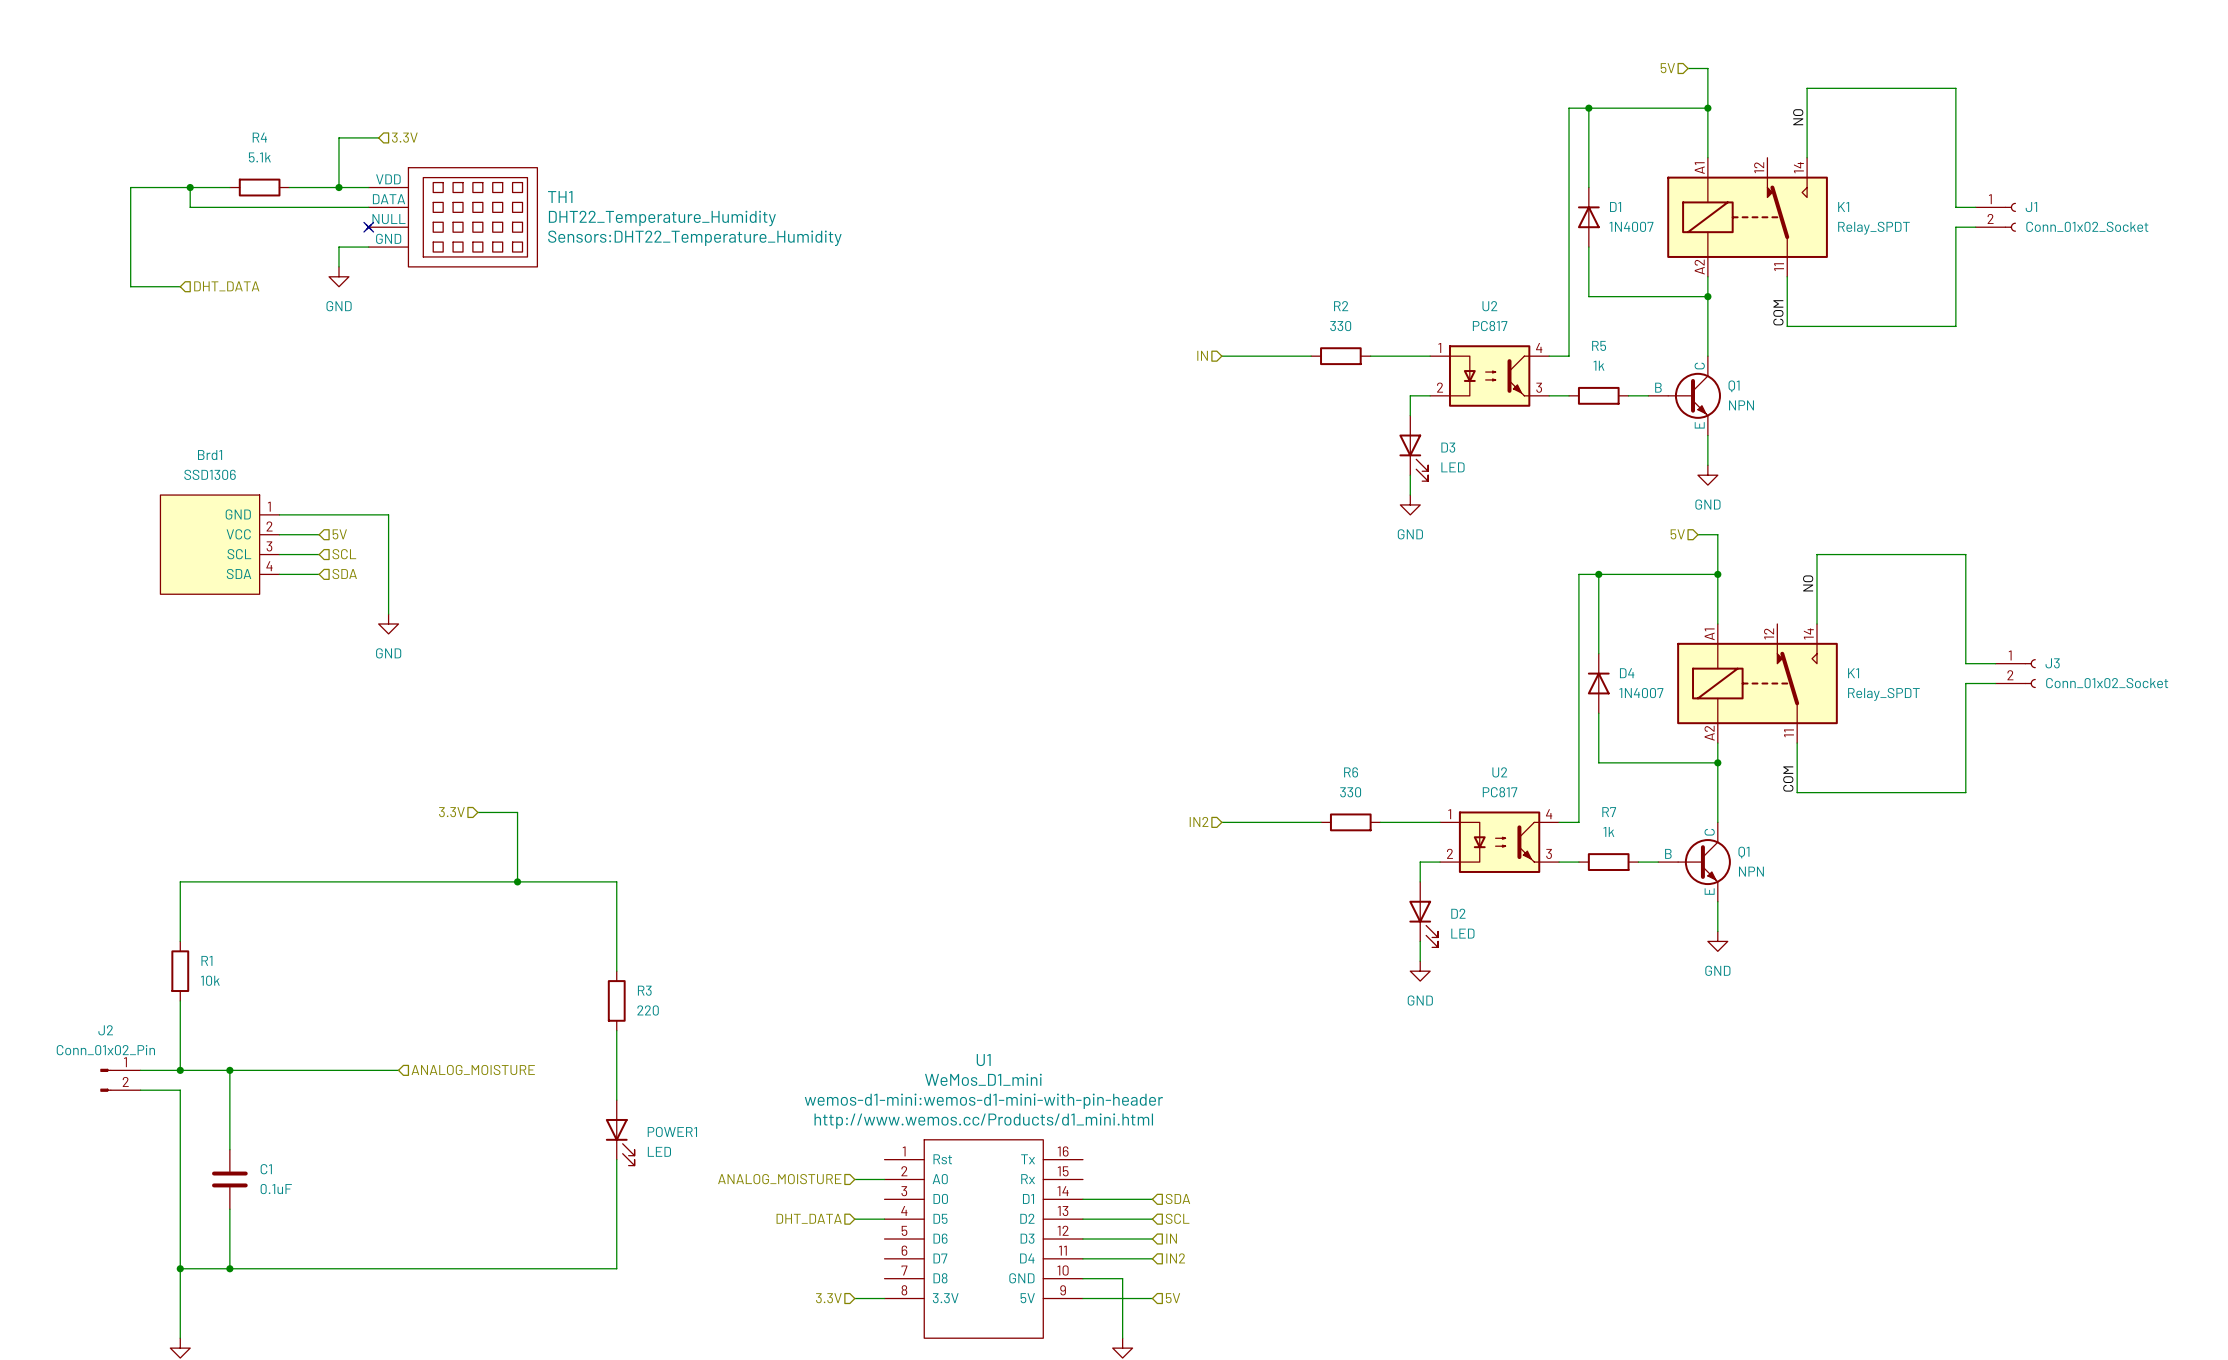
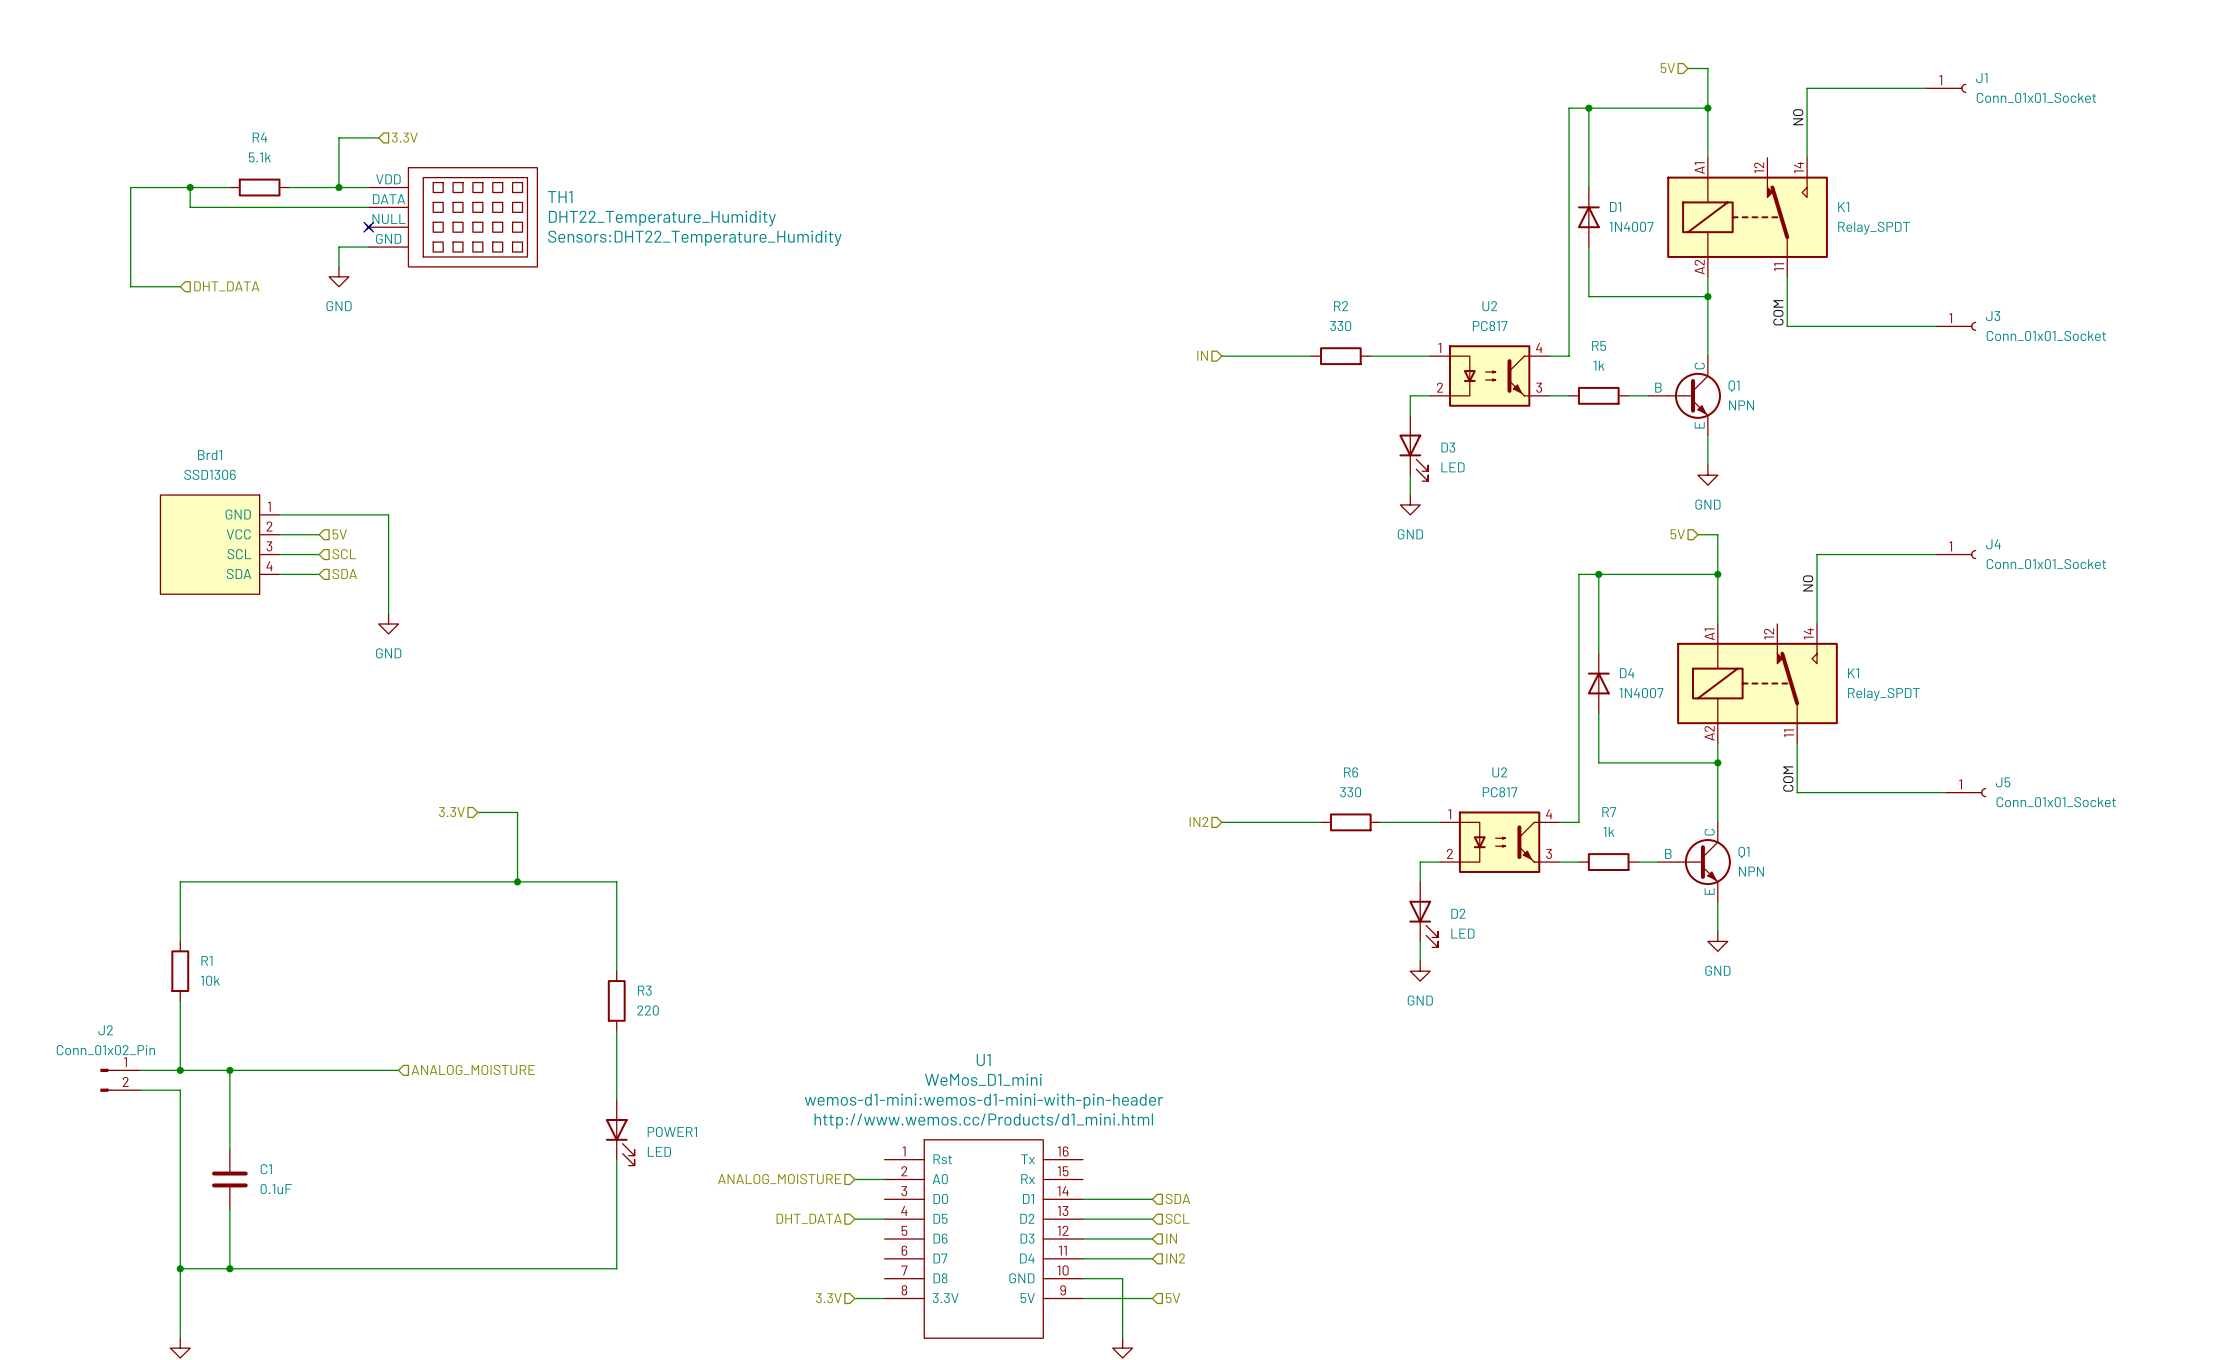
wire: (1926, 88) (1955, 88) (1955, 207) (1975, 207) -> none
J1 symbol: [1975, 202, 2016, 232] -> [1926, 83, 1967, 93]
J1 value: Conn_01x02_Socket (2087, 226) -> Conn_01x01_Socket (2036, 97)
wire: (1975, 227) (1955, 227) (1955, 326) (1936, 326) -> none
wire: (1936, 554) (1965, 554) (1965, 663) (1995, 663) -> none
J4: none -> Conn_01x01_Socket (1956, 554)
J3 symbol: [1995, 659, 2036, 689] -> [1936, 321, 1977, 331]
wire: (1995, 683) (1965, 683) (1965, 792) (1945, 792) -> none
J3 value: Conn_01x02_Socket (2107, 683) -> Conn_01x01_Socket (2046, 335)
J5: none -> Conn_01x01_Socket (1966, 792)

